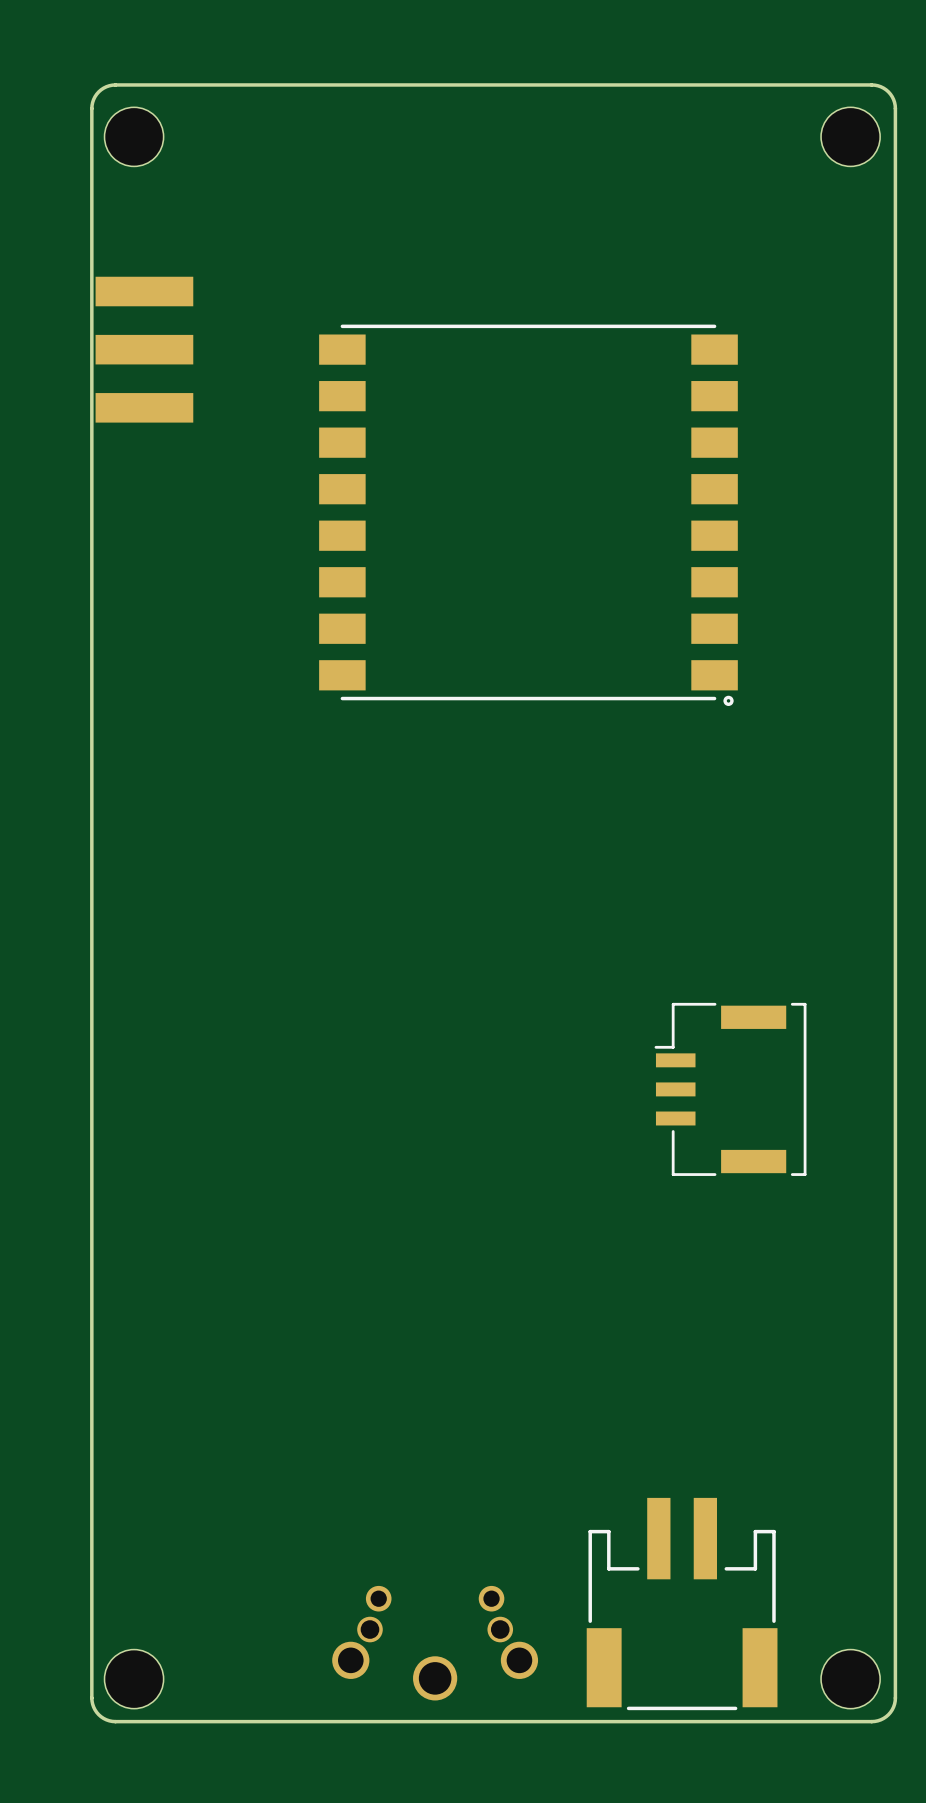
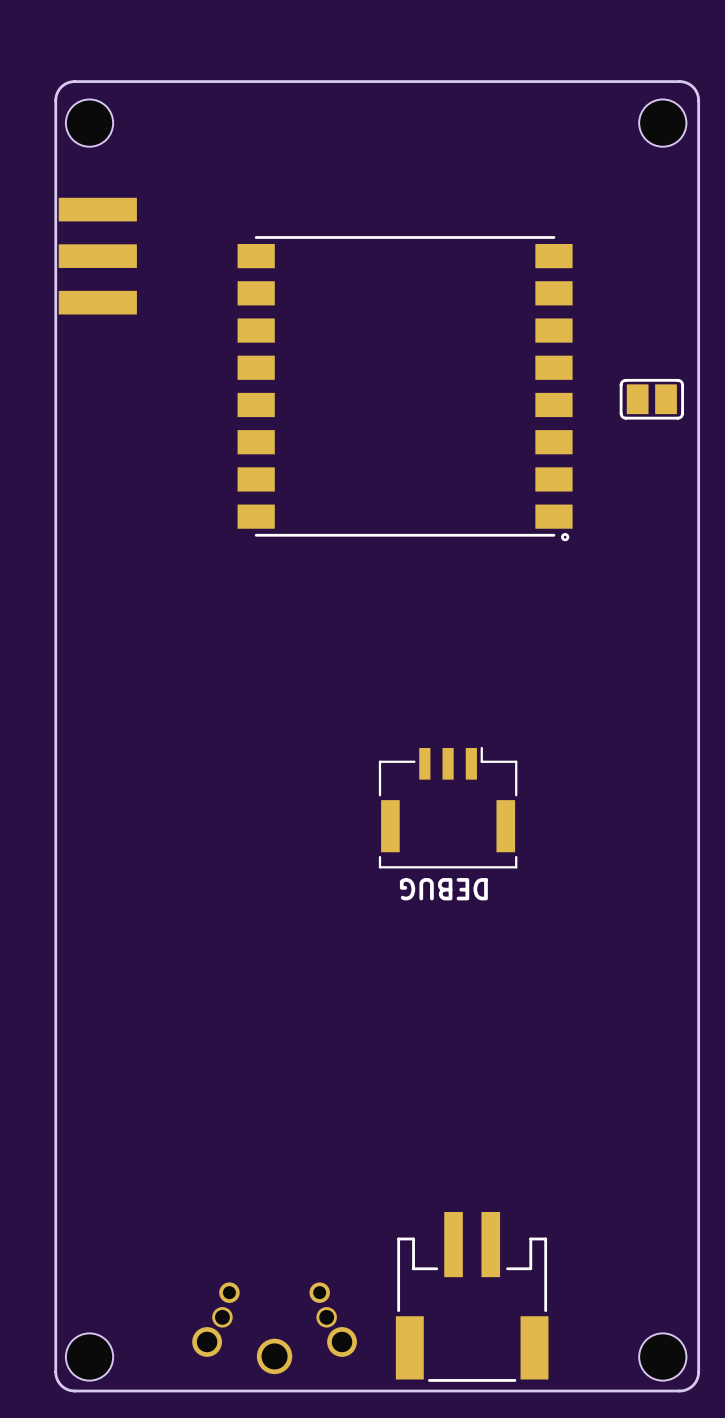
part position: (144, 349) -> (97, 256)
part: none -> (651, 399)
part position: (528, 515) -> (405, 388)
part rotation: 0° (730, 1089) -> 90° clockwise (448, 807)
part position: (730, 1089) -> (448, 807)
text: none -> DEBUG (443, 889)
part position: (682, 1604) -> (472, 1296)
part position: (435, 1643) -> (274, 1328)

